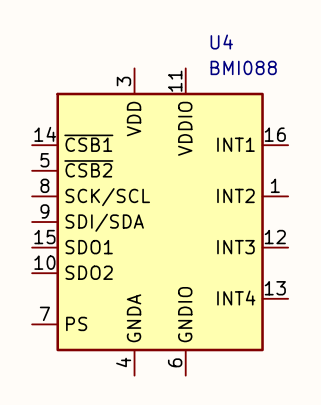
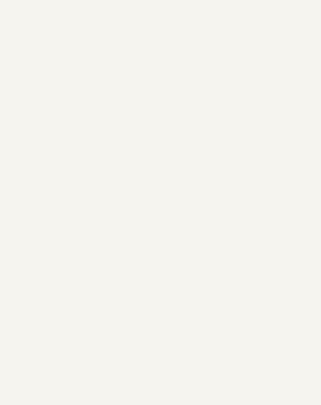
U4: BMI088 (160, 222) -> none

